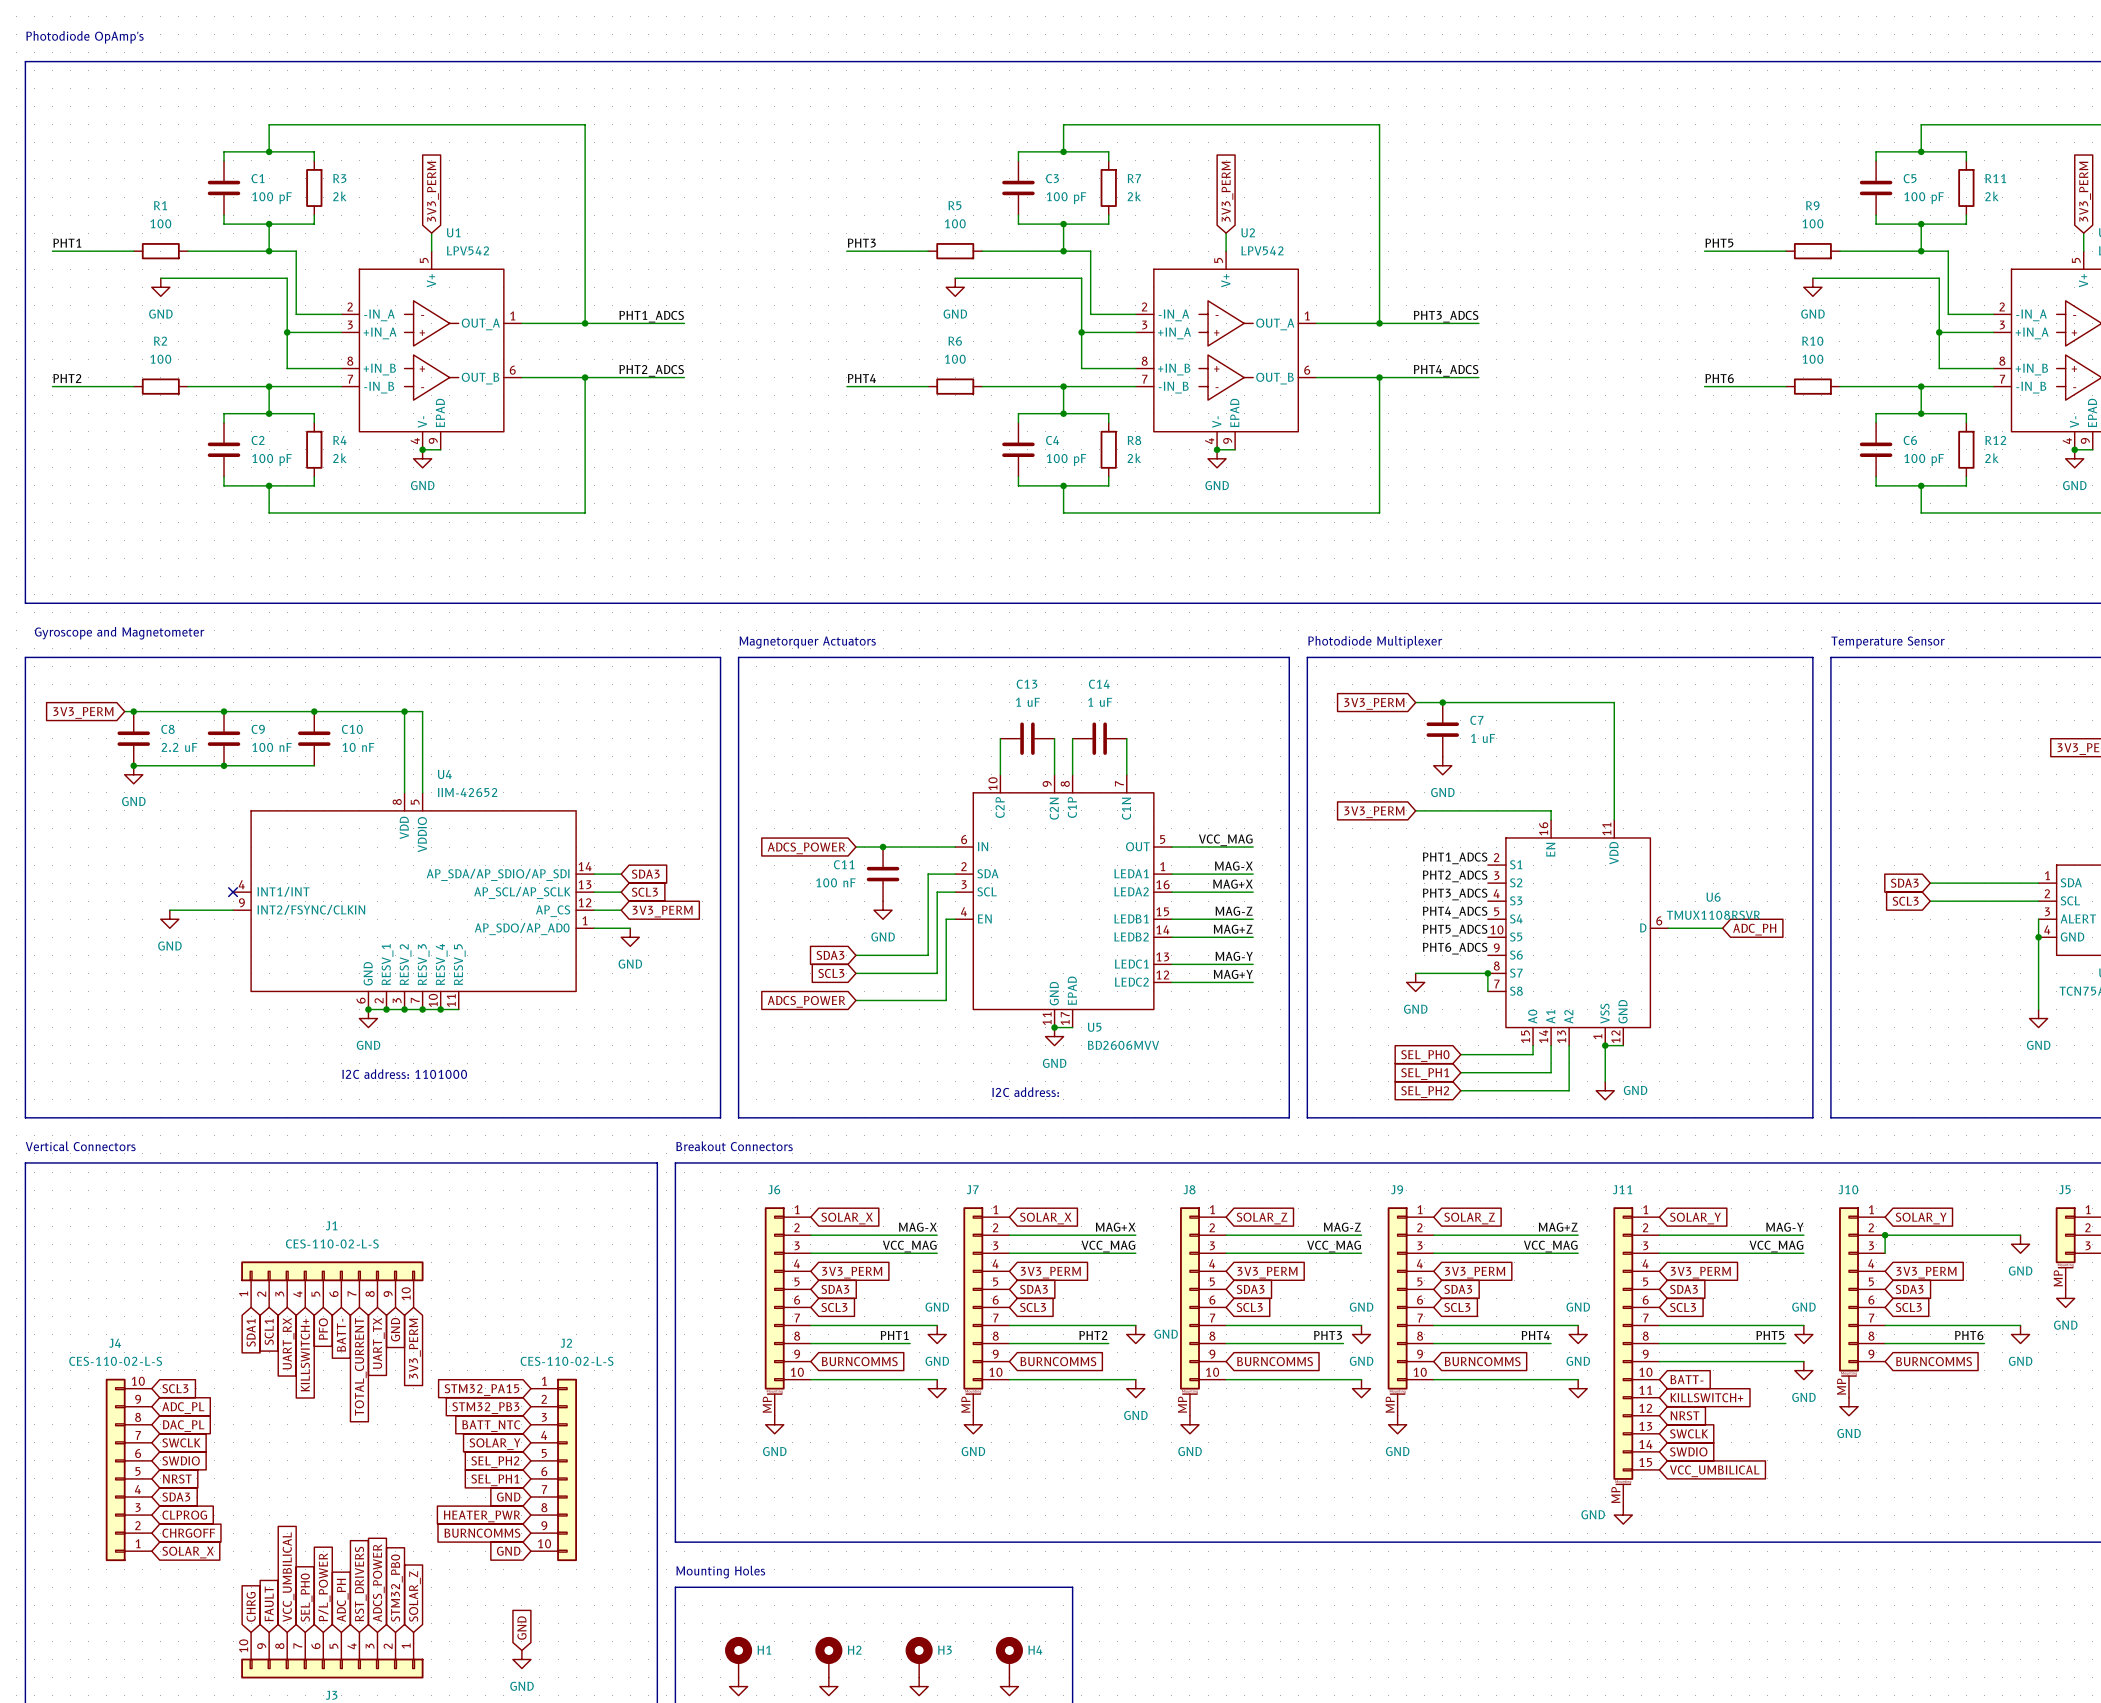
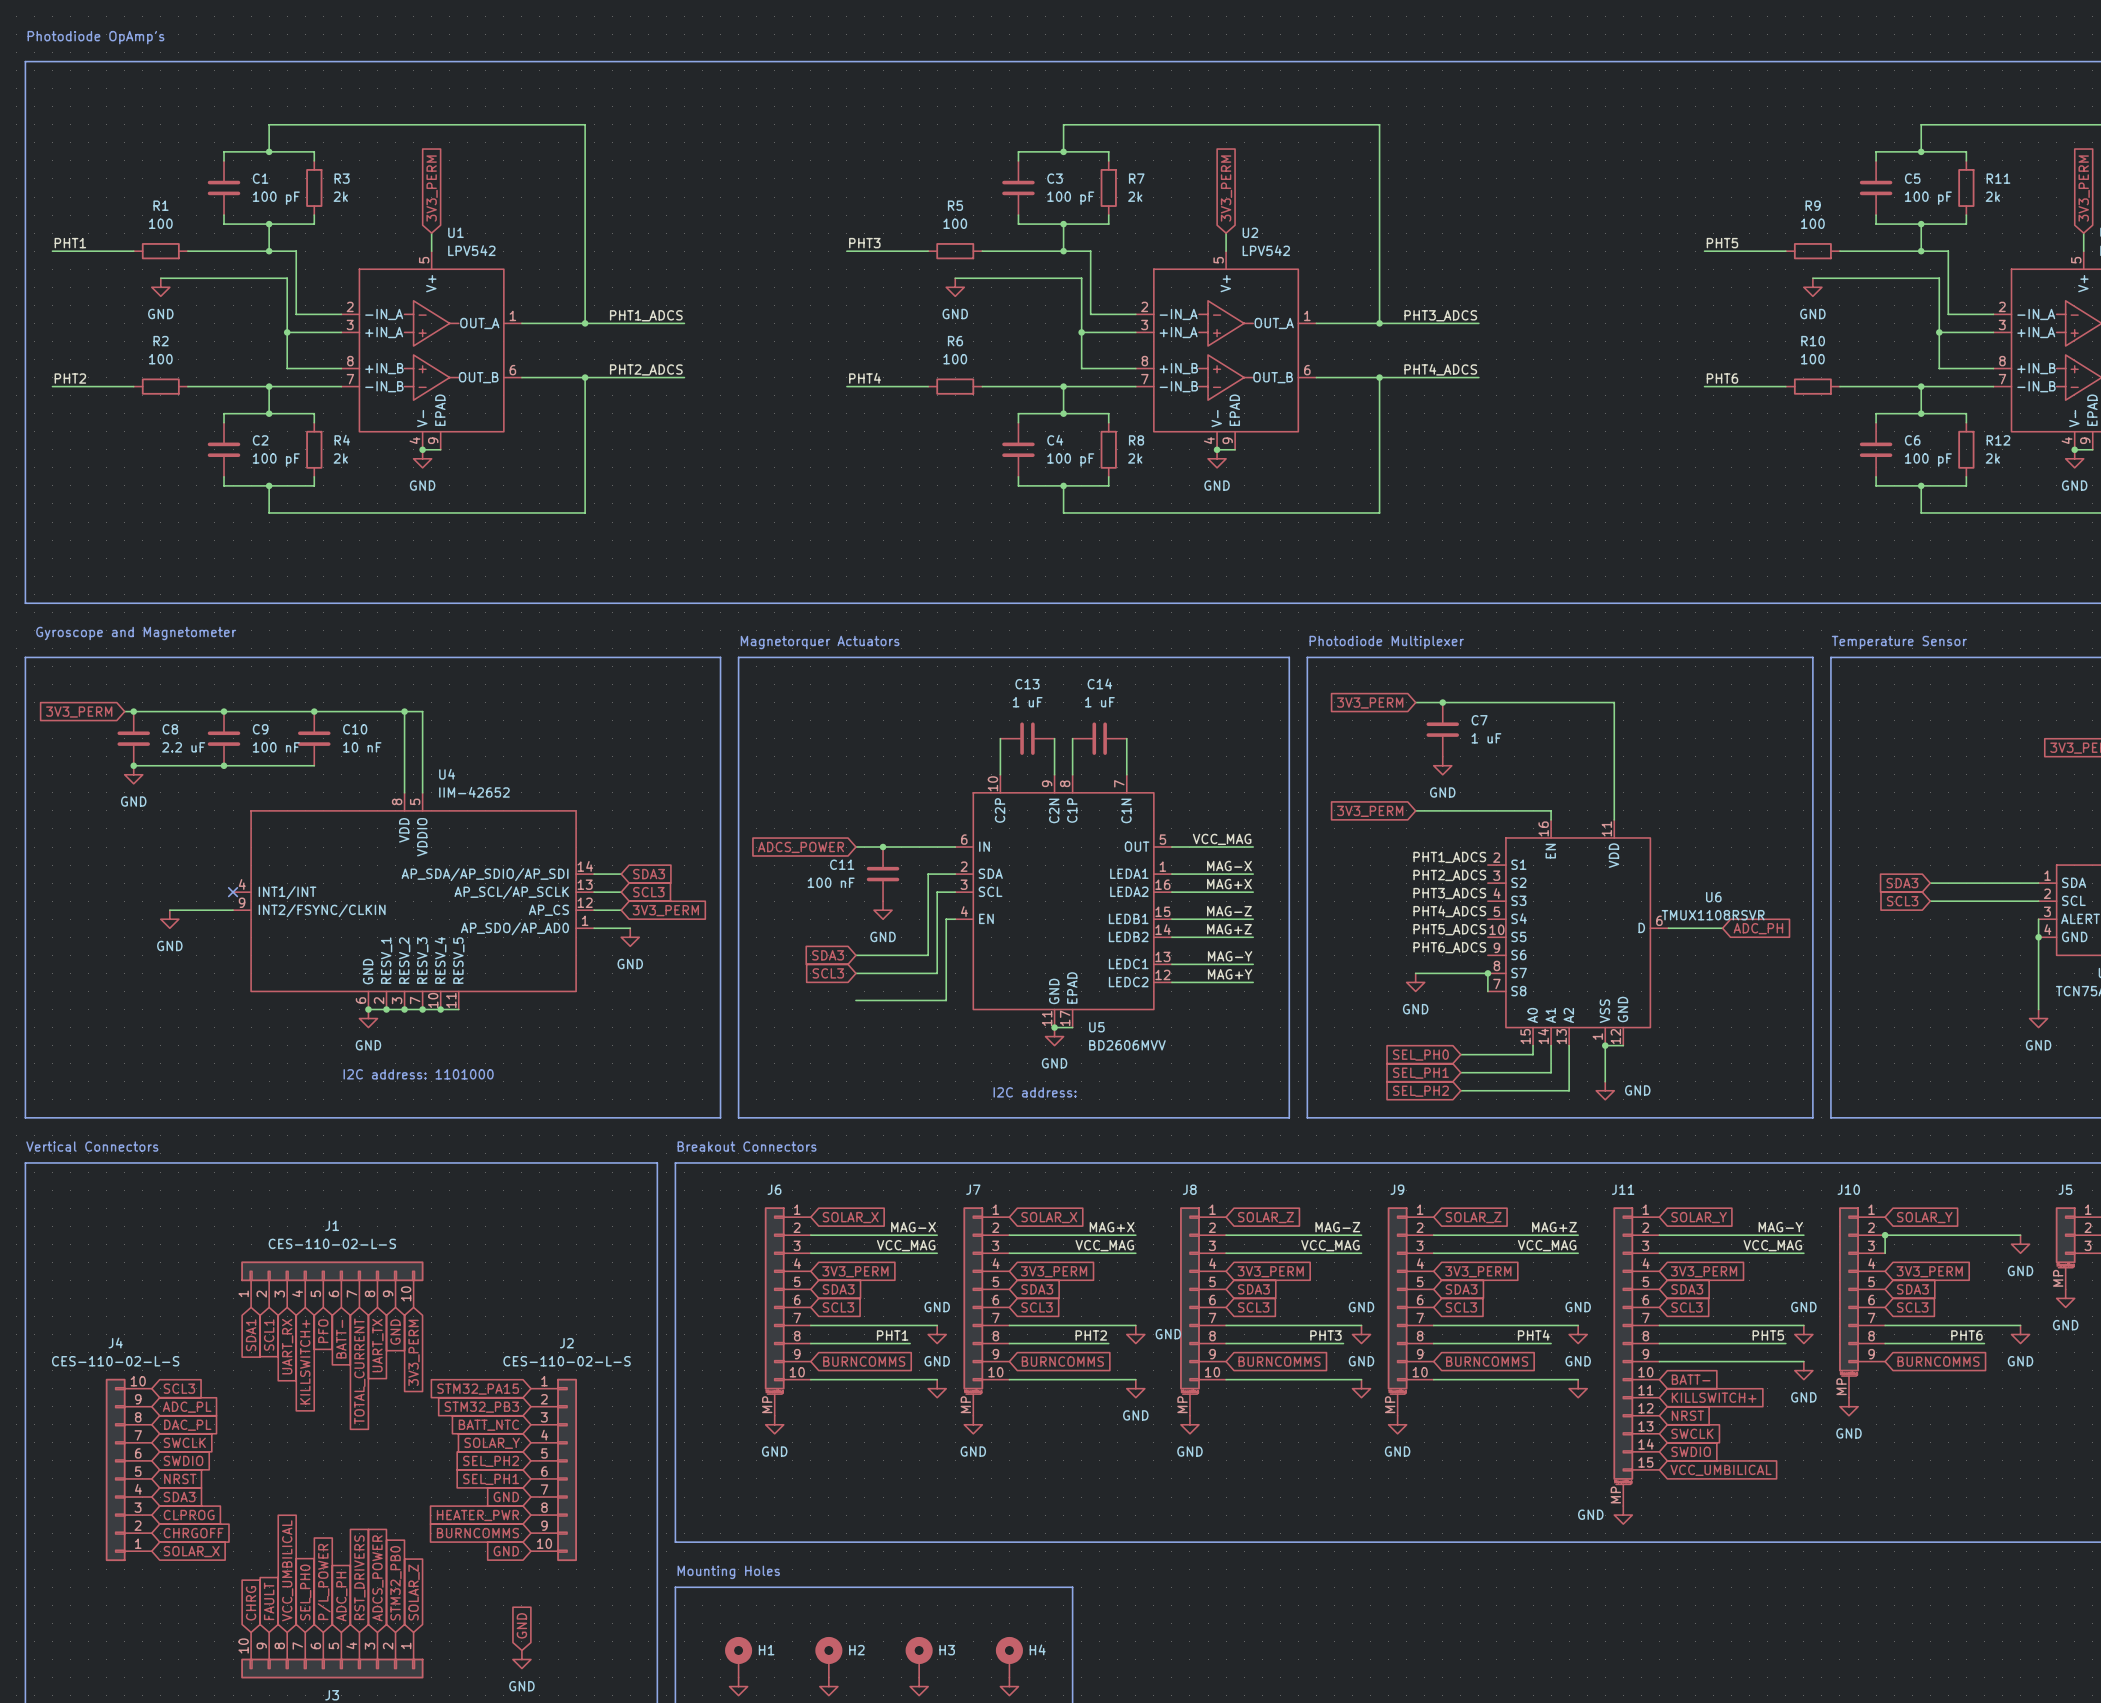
global label: ADCS_POWER (806, 1001) -> none

